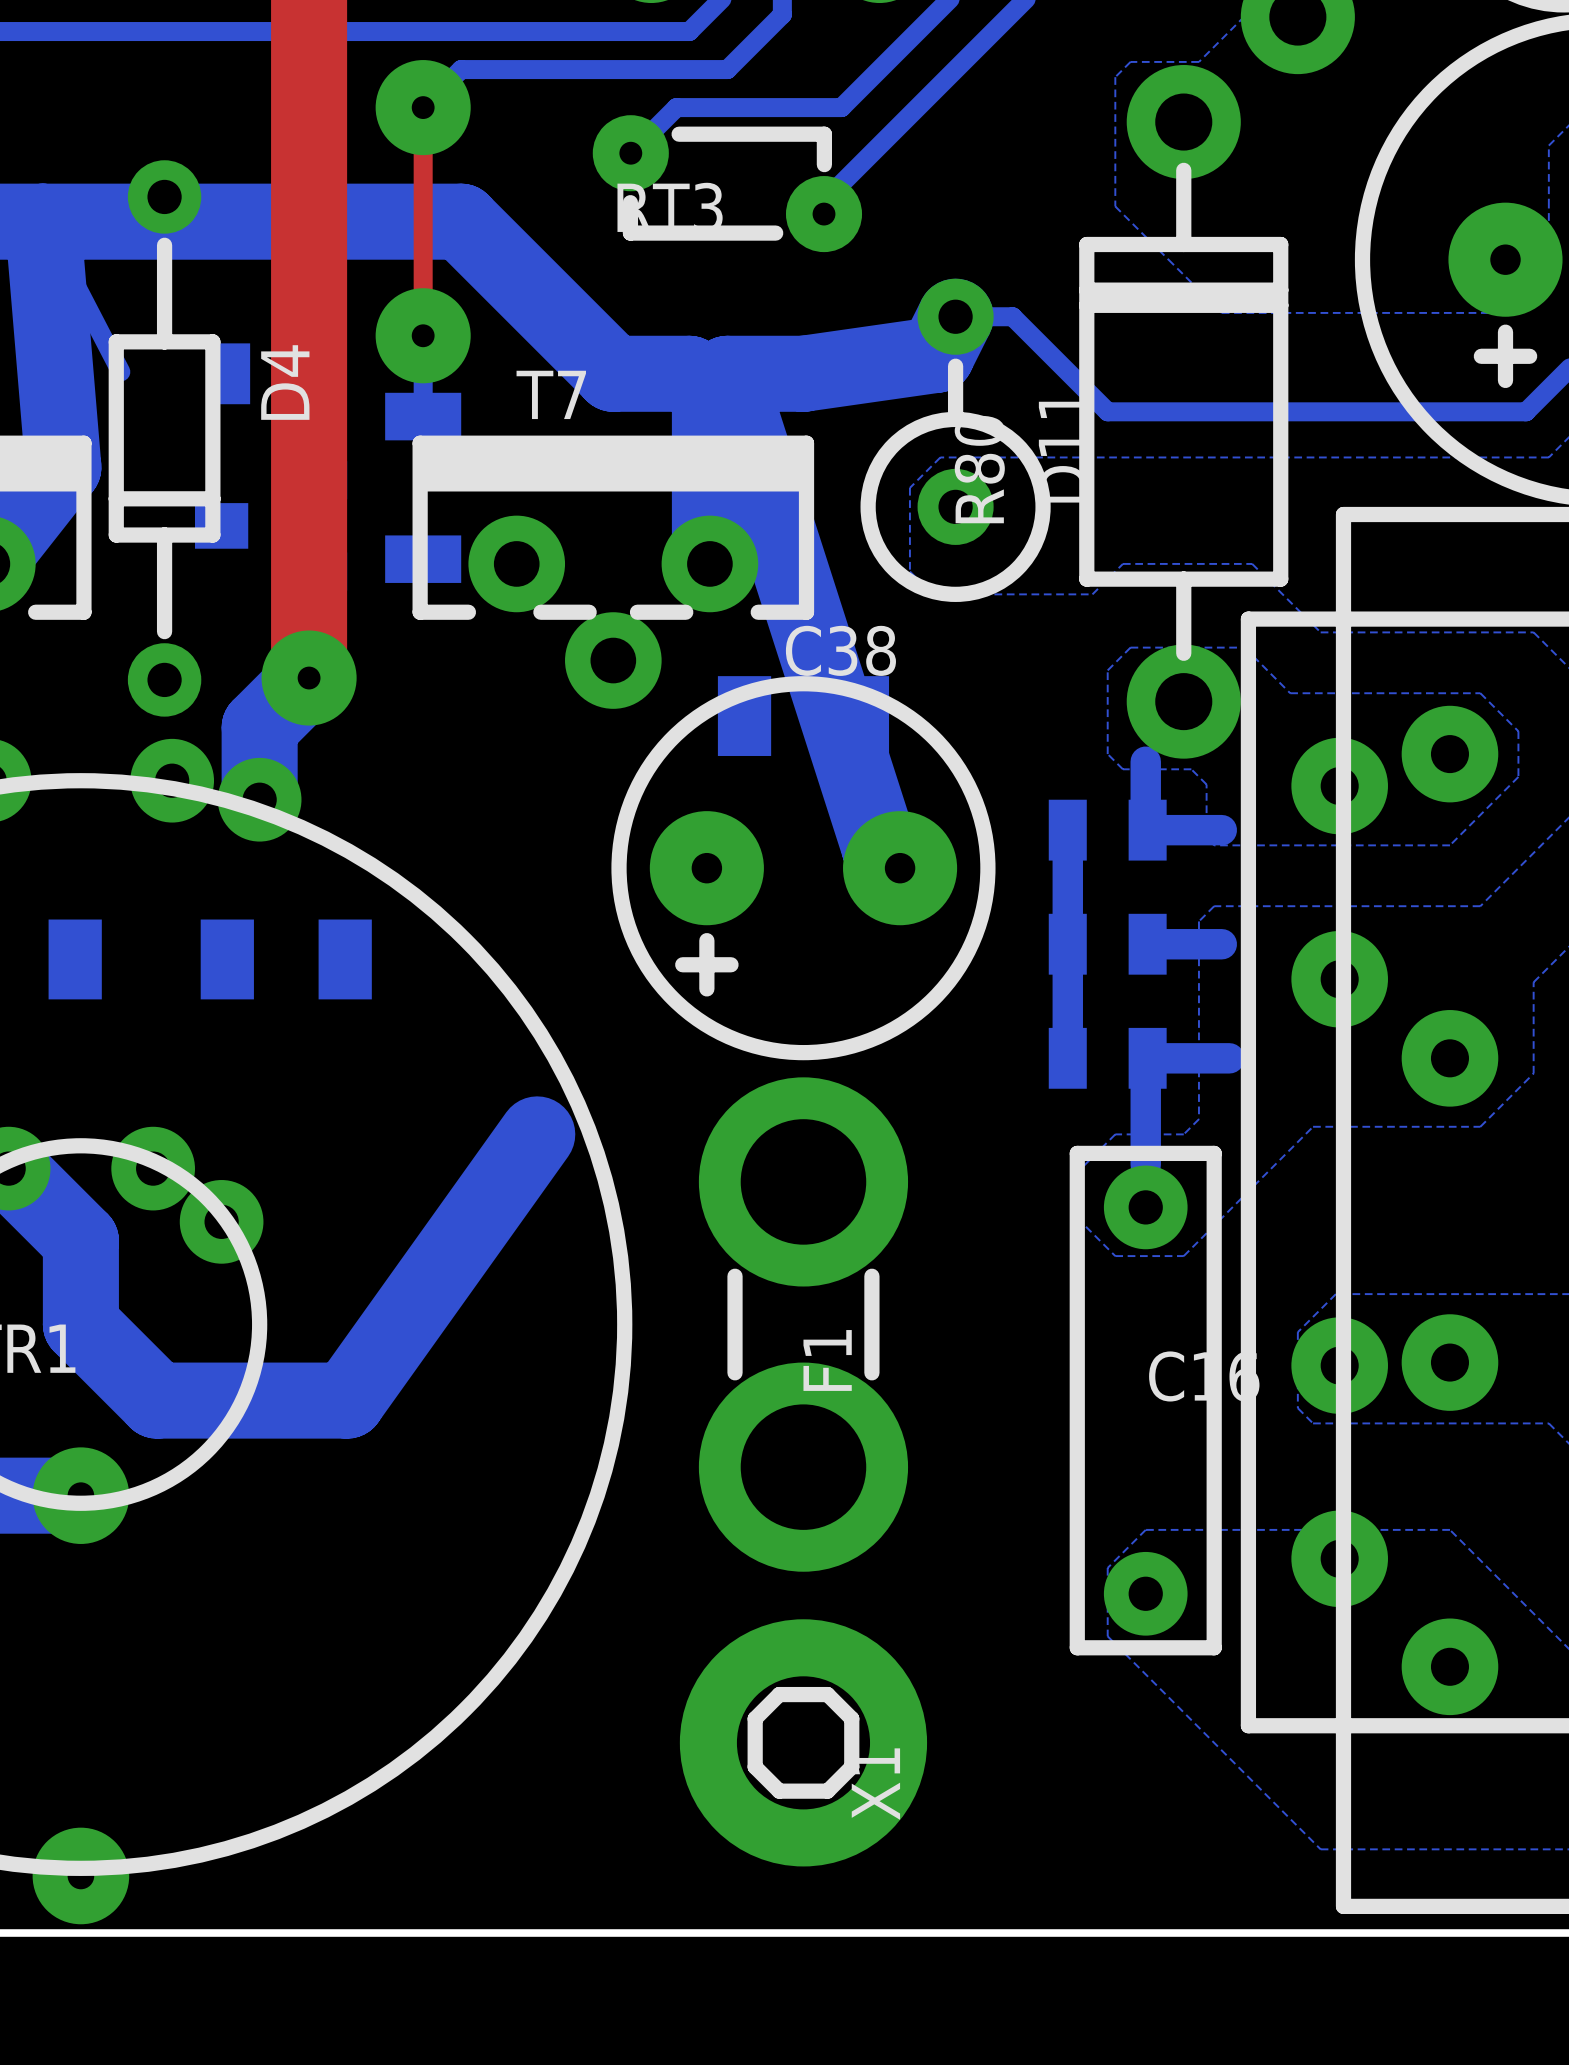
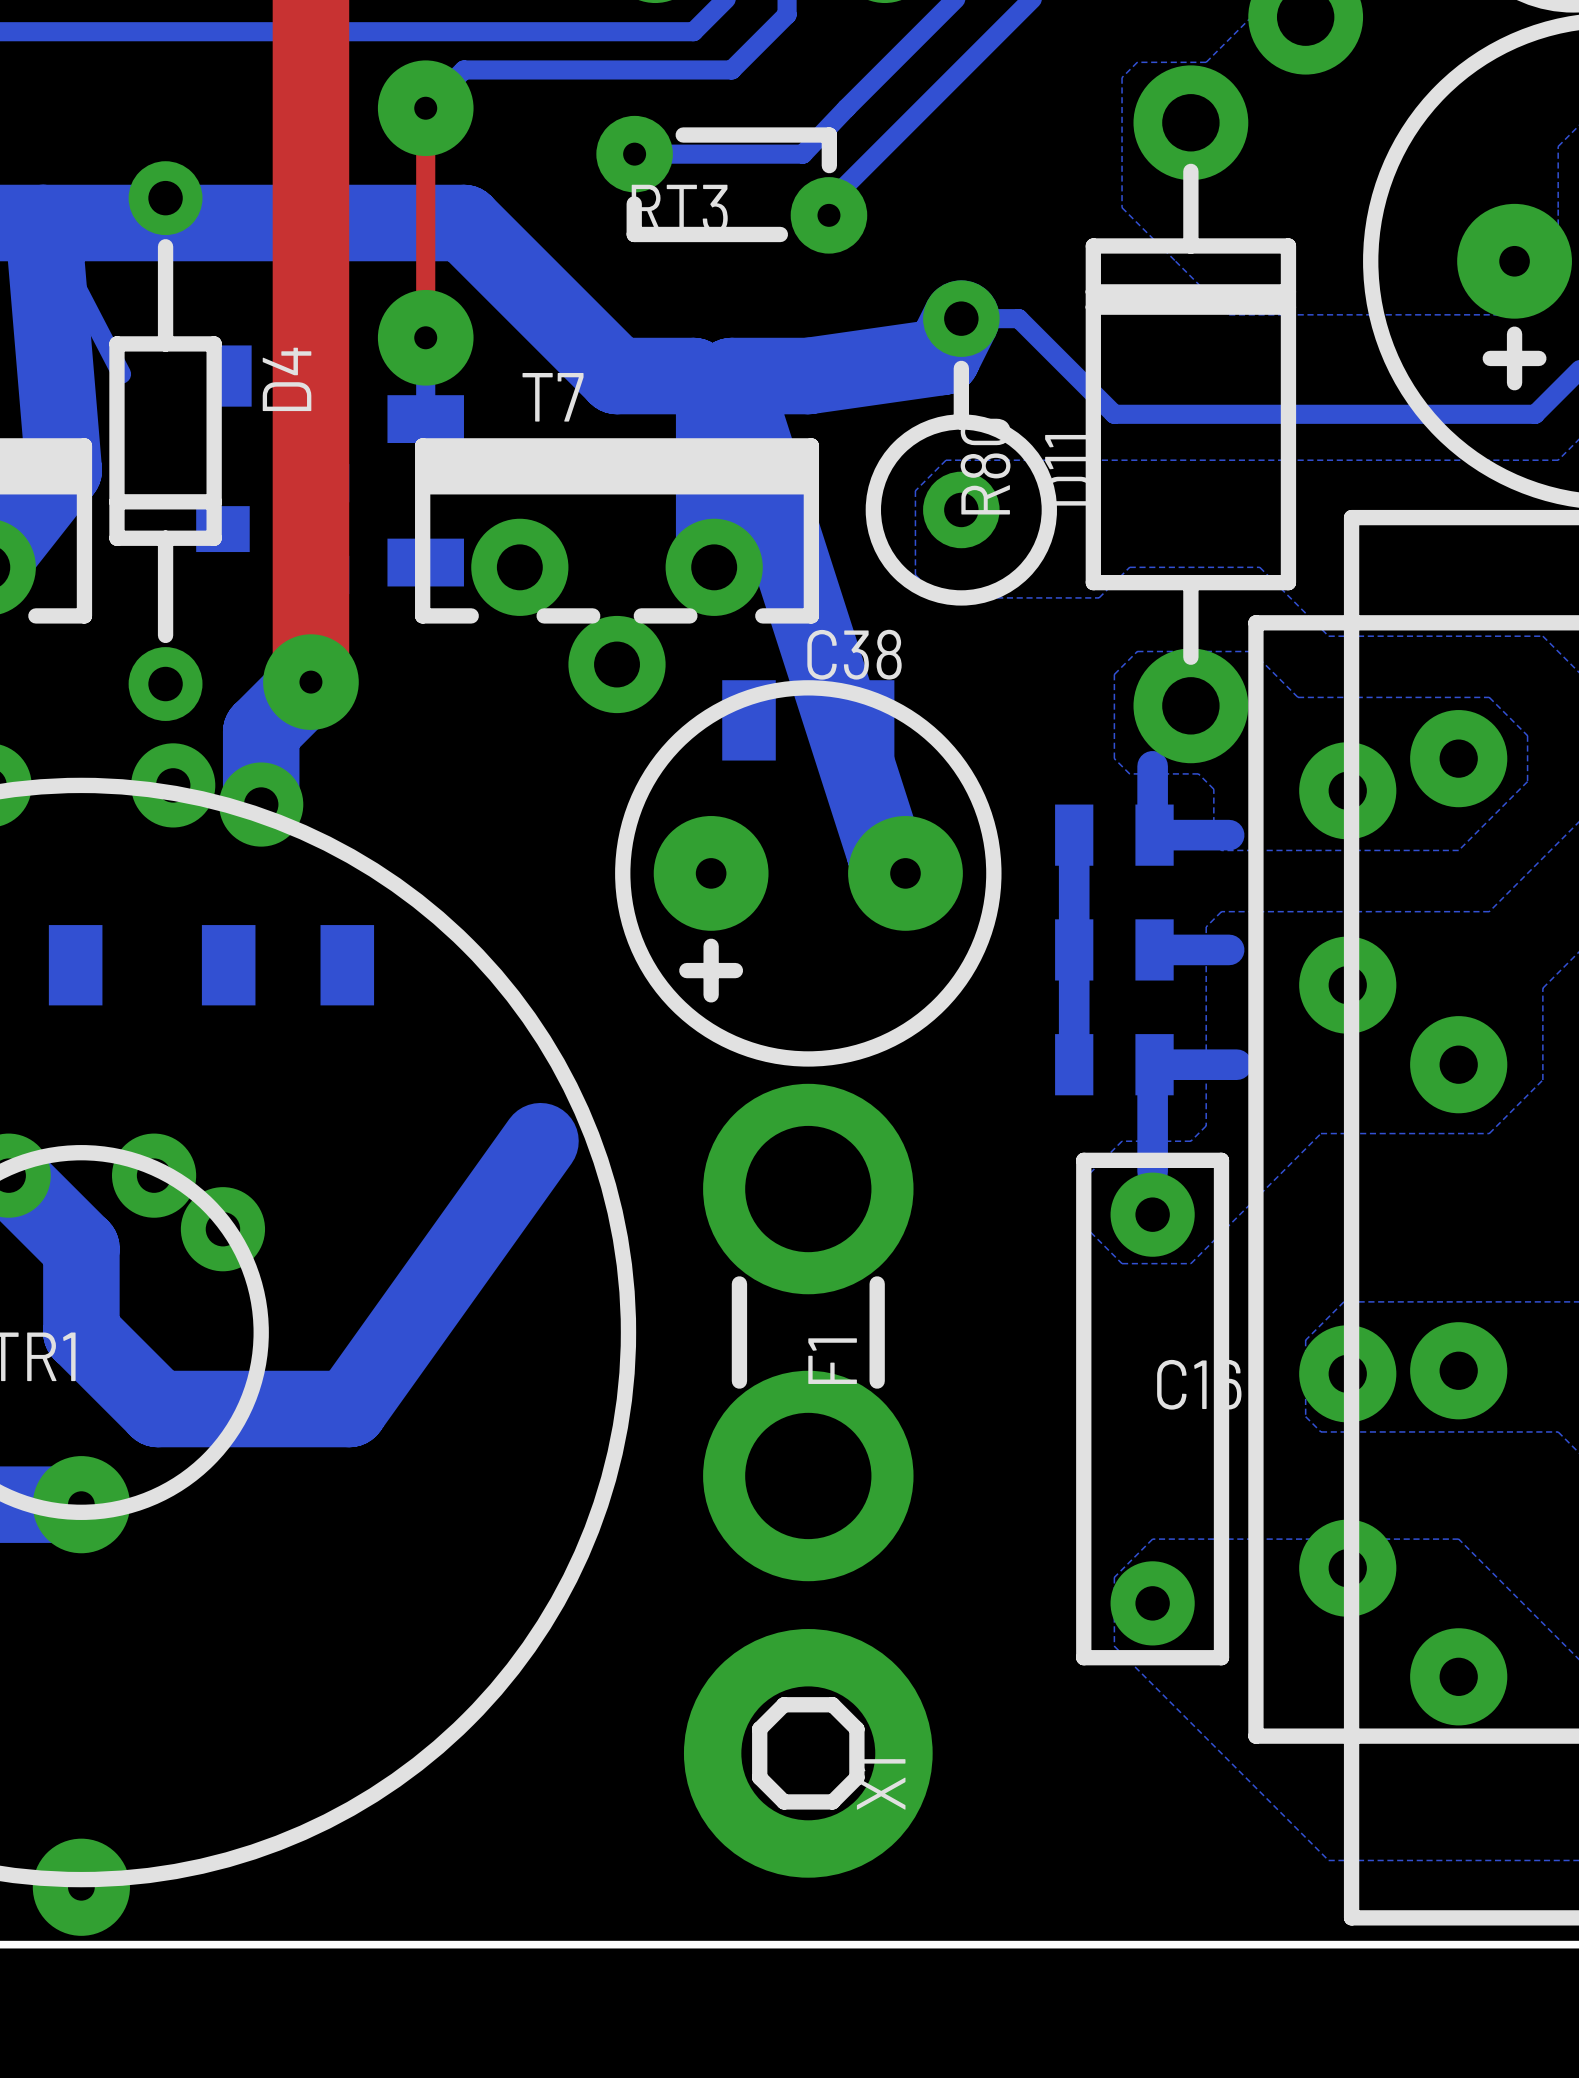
bottom track: (841, 107) (676, 107) (630, 153) -> (846, 108) (802, 154) (634, 154)

